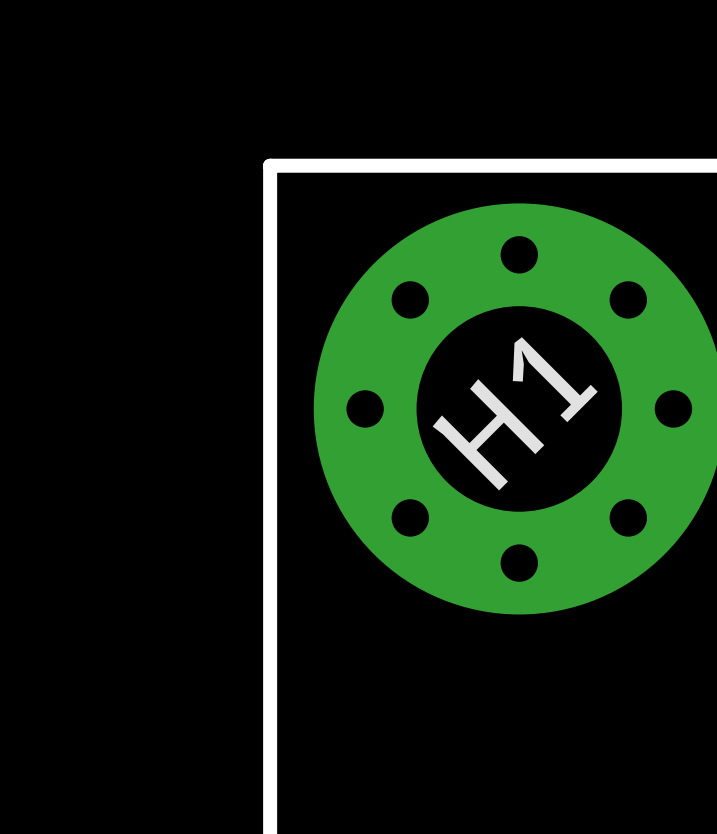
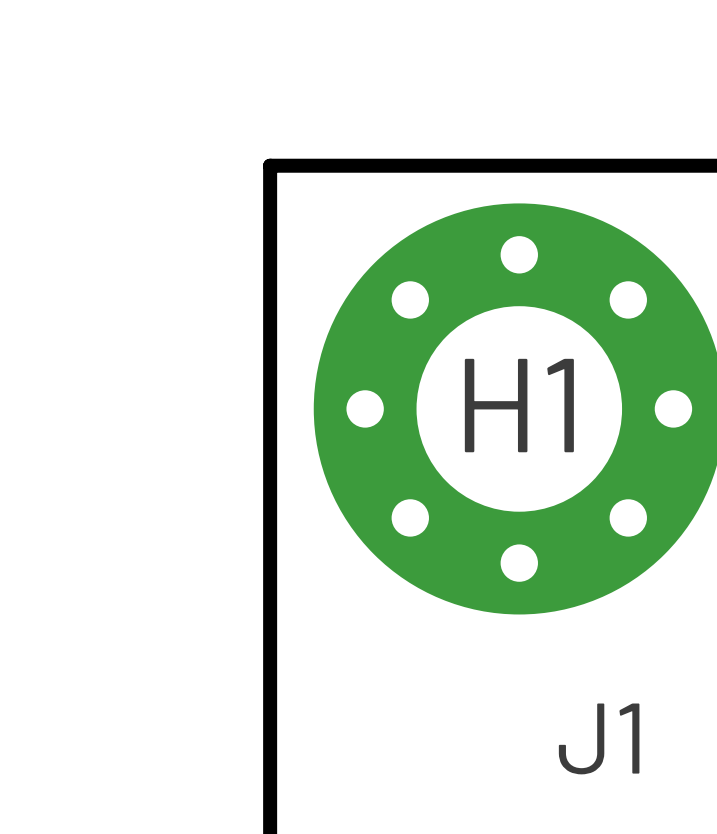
H1 name rotation: 0° (515, 413) -> 45° clockwise (519, 405)
J1 name: none -> J1 (599, 738)

